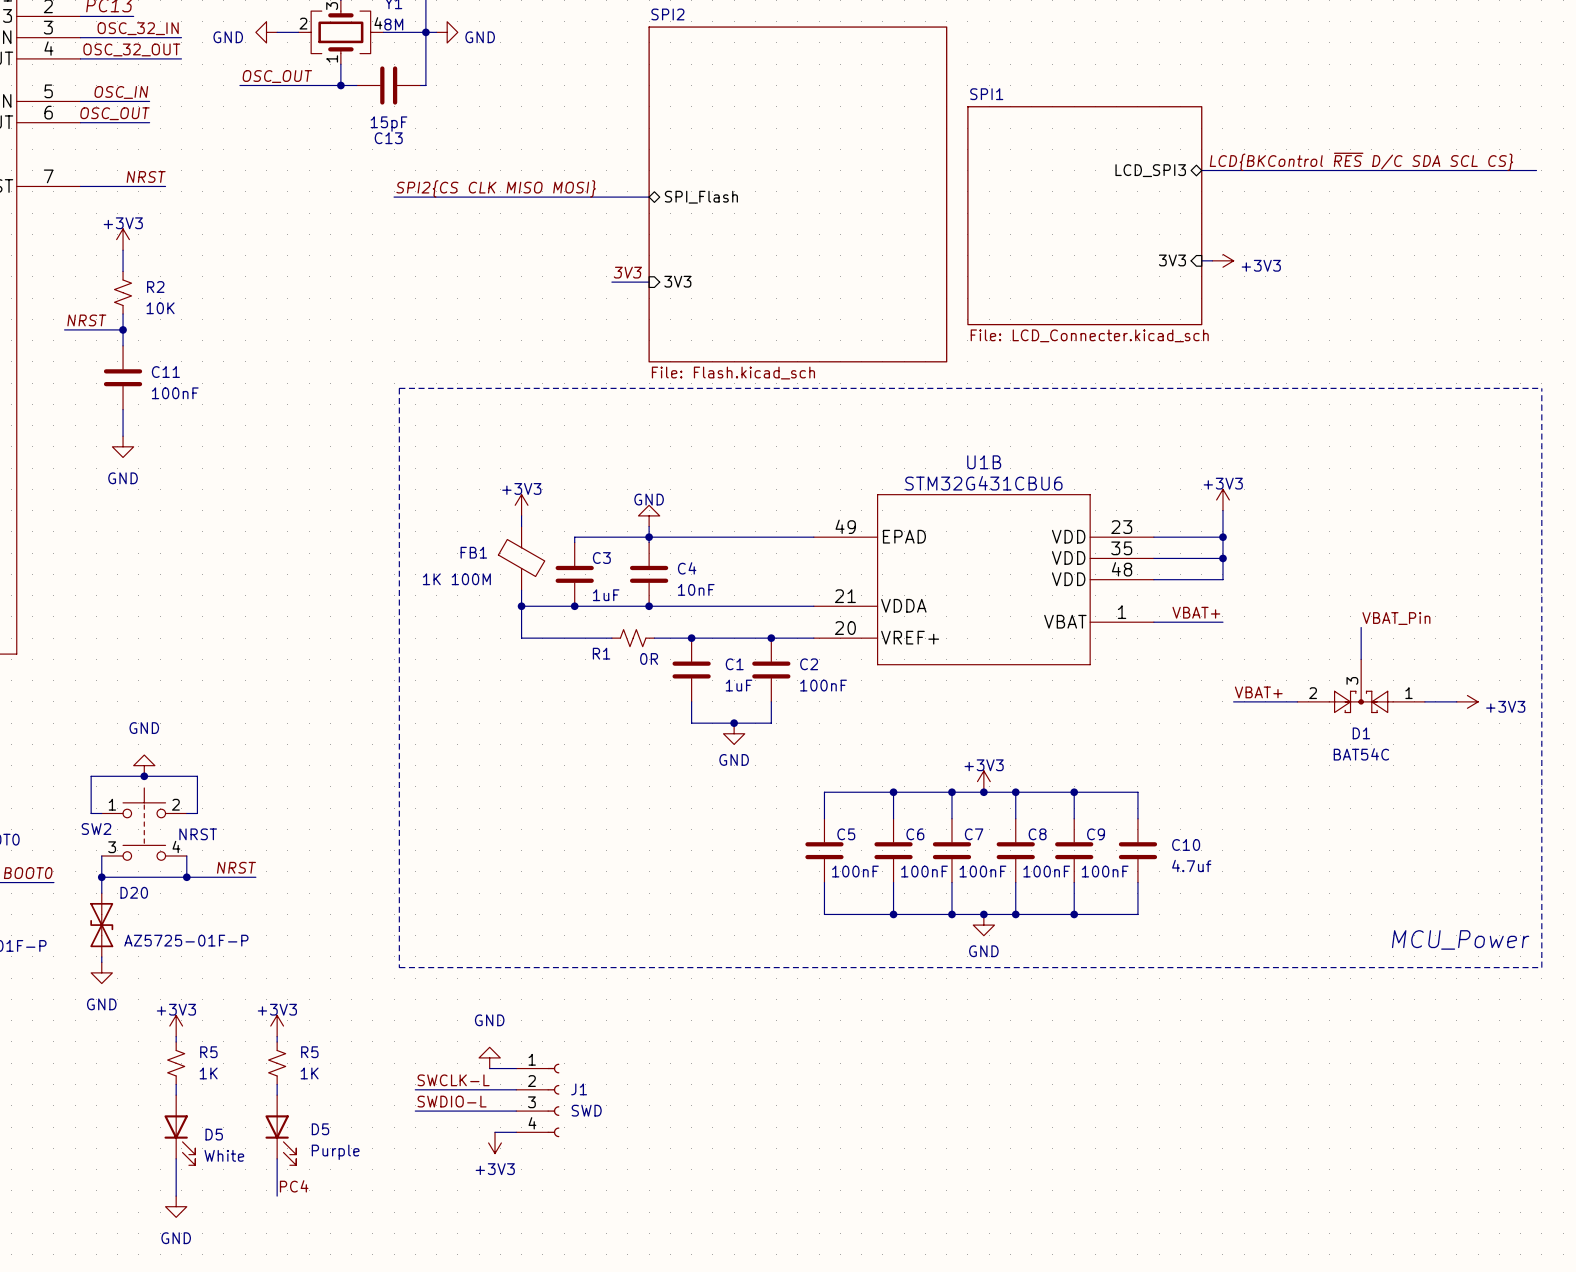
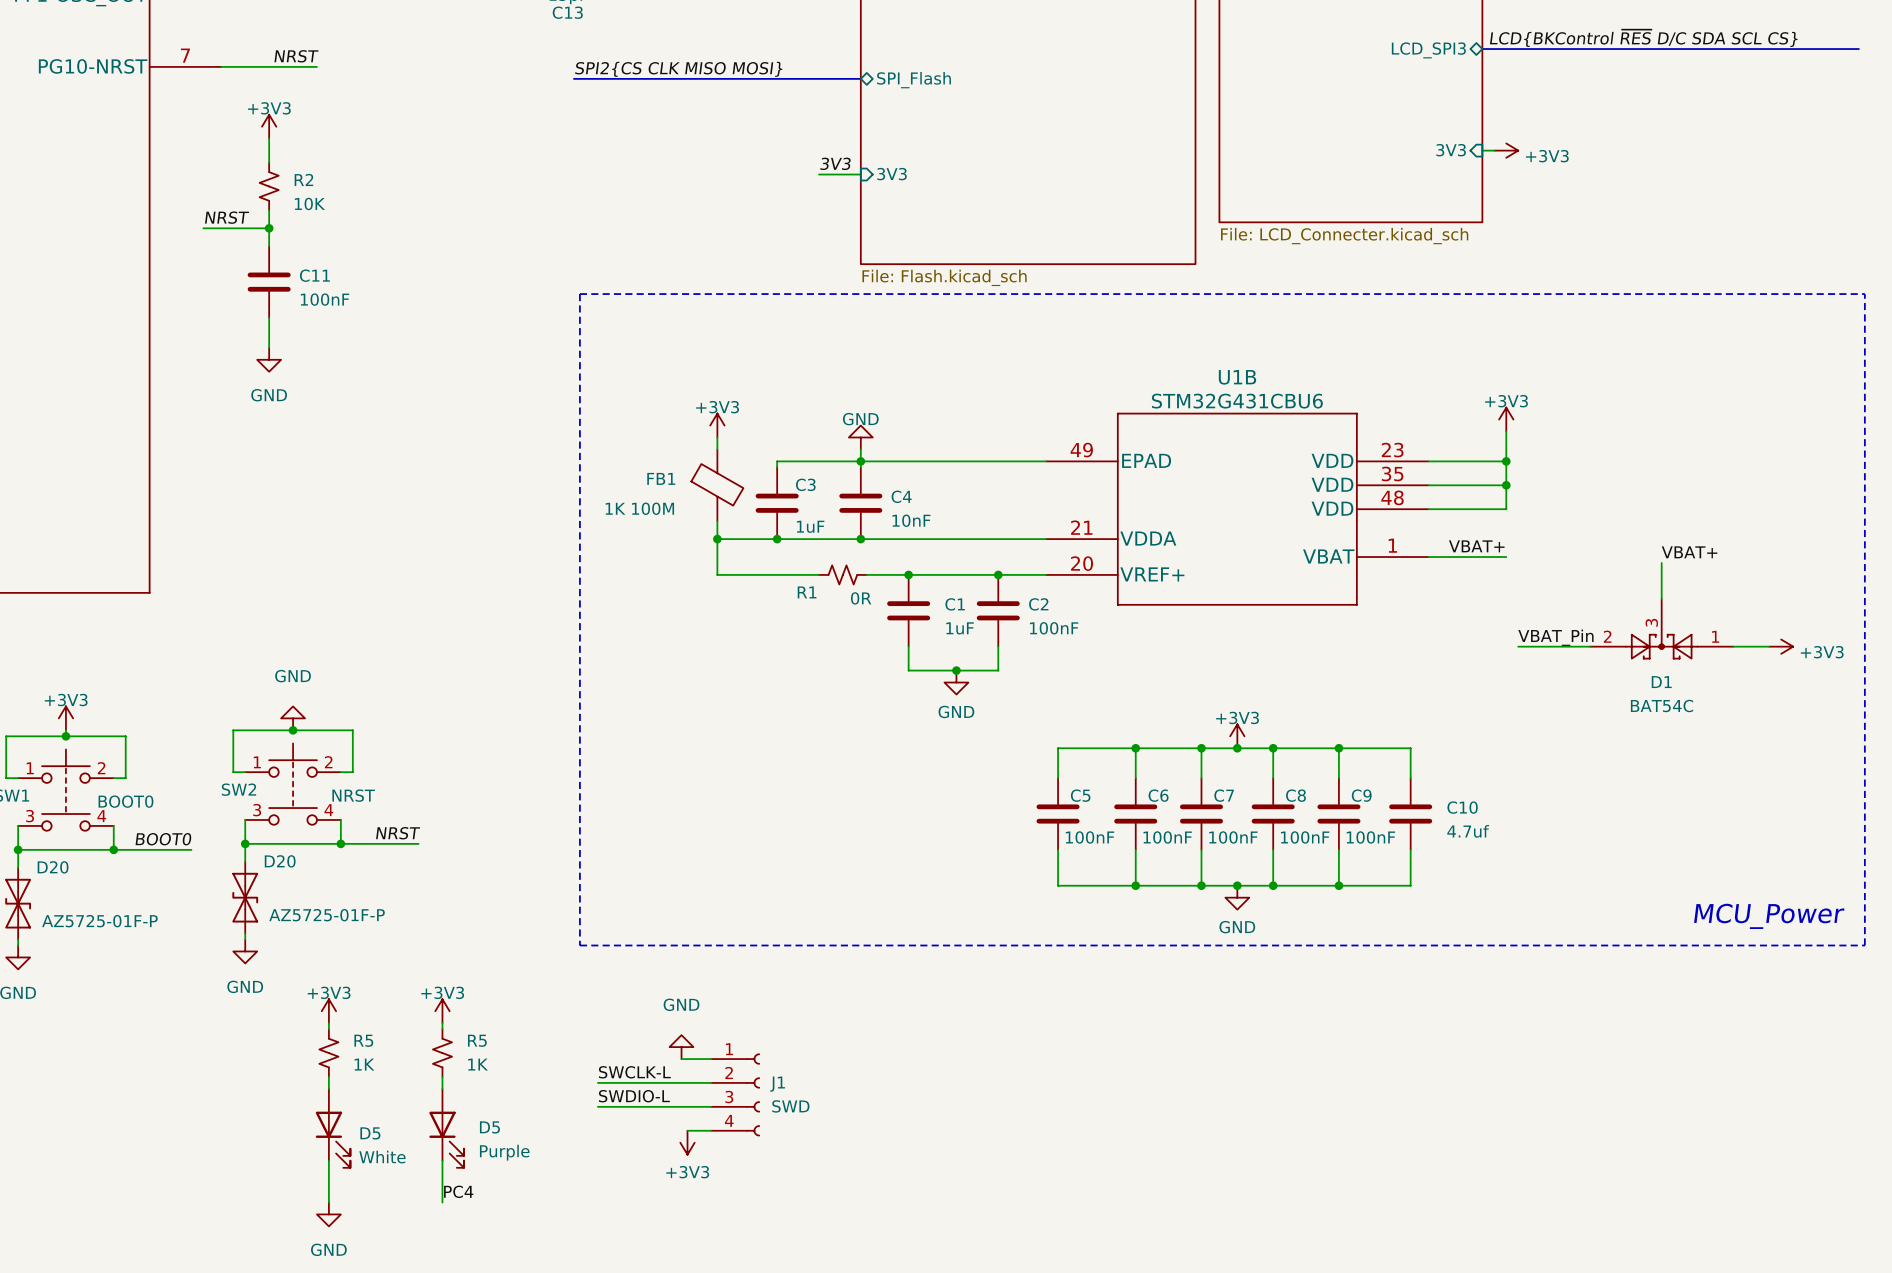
label: VBAT_Pin (1396, 618) -> VBAT+ (1689, 552)
label: VBAT+ (1258, 692) -> VBAT_Pin (1555, 637)

